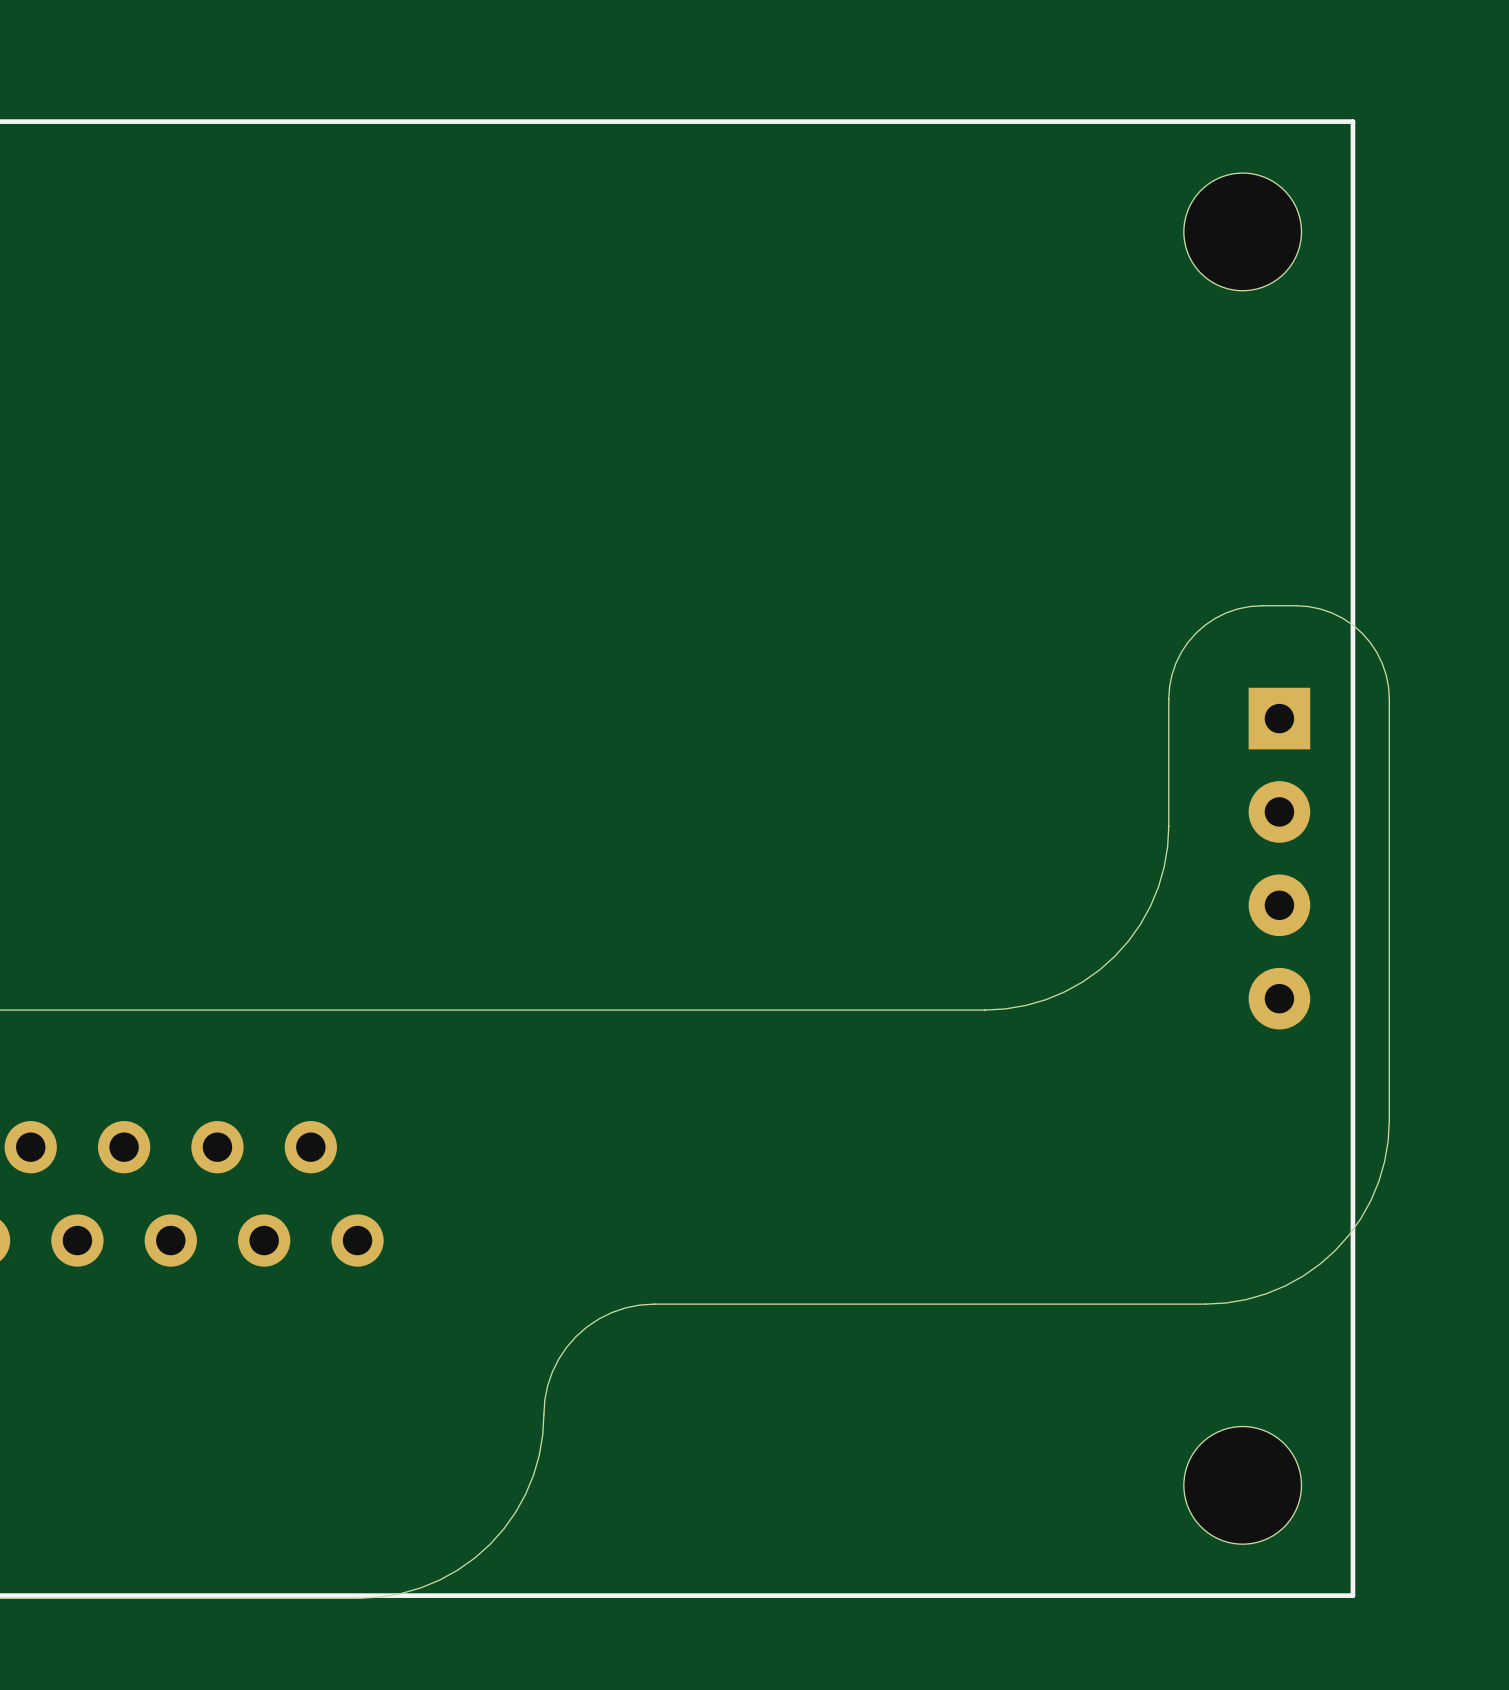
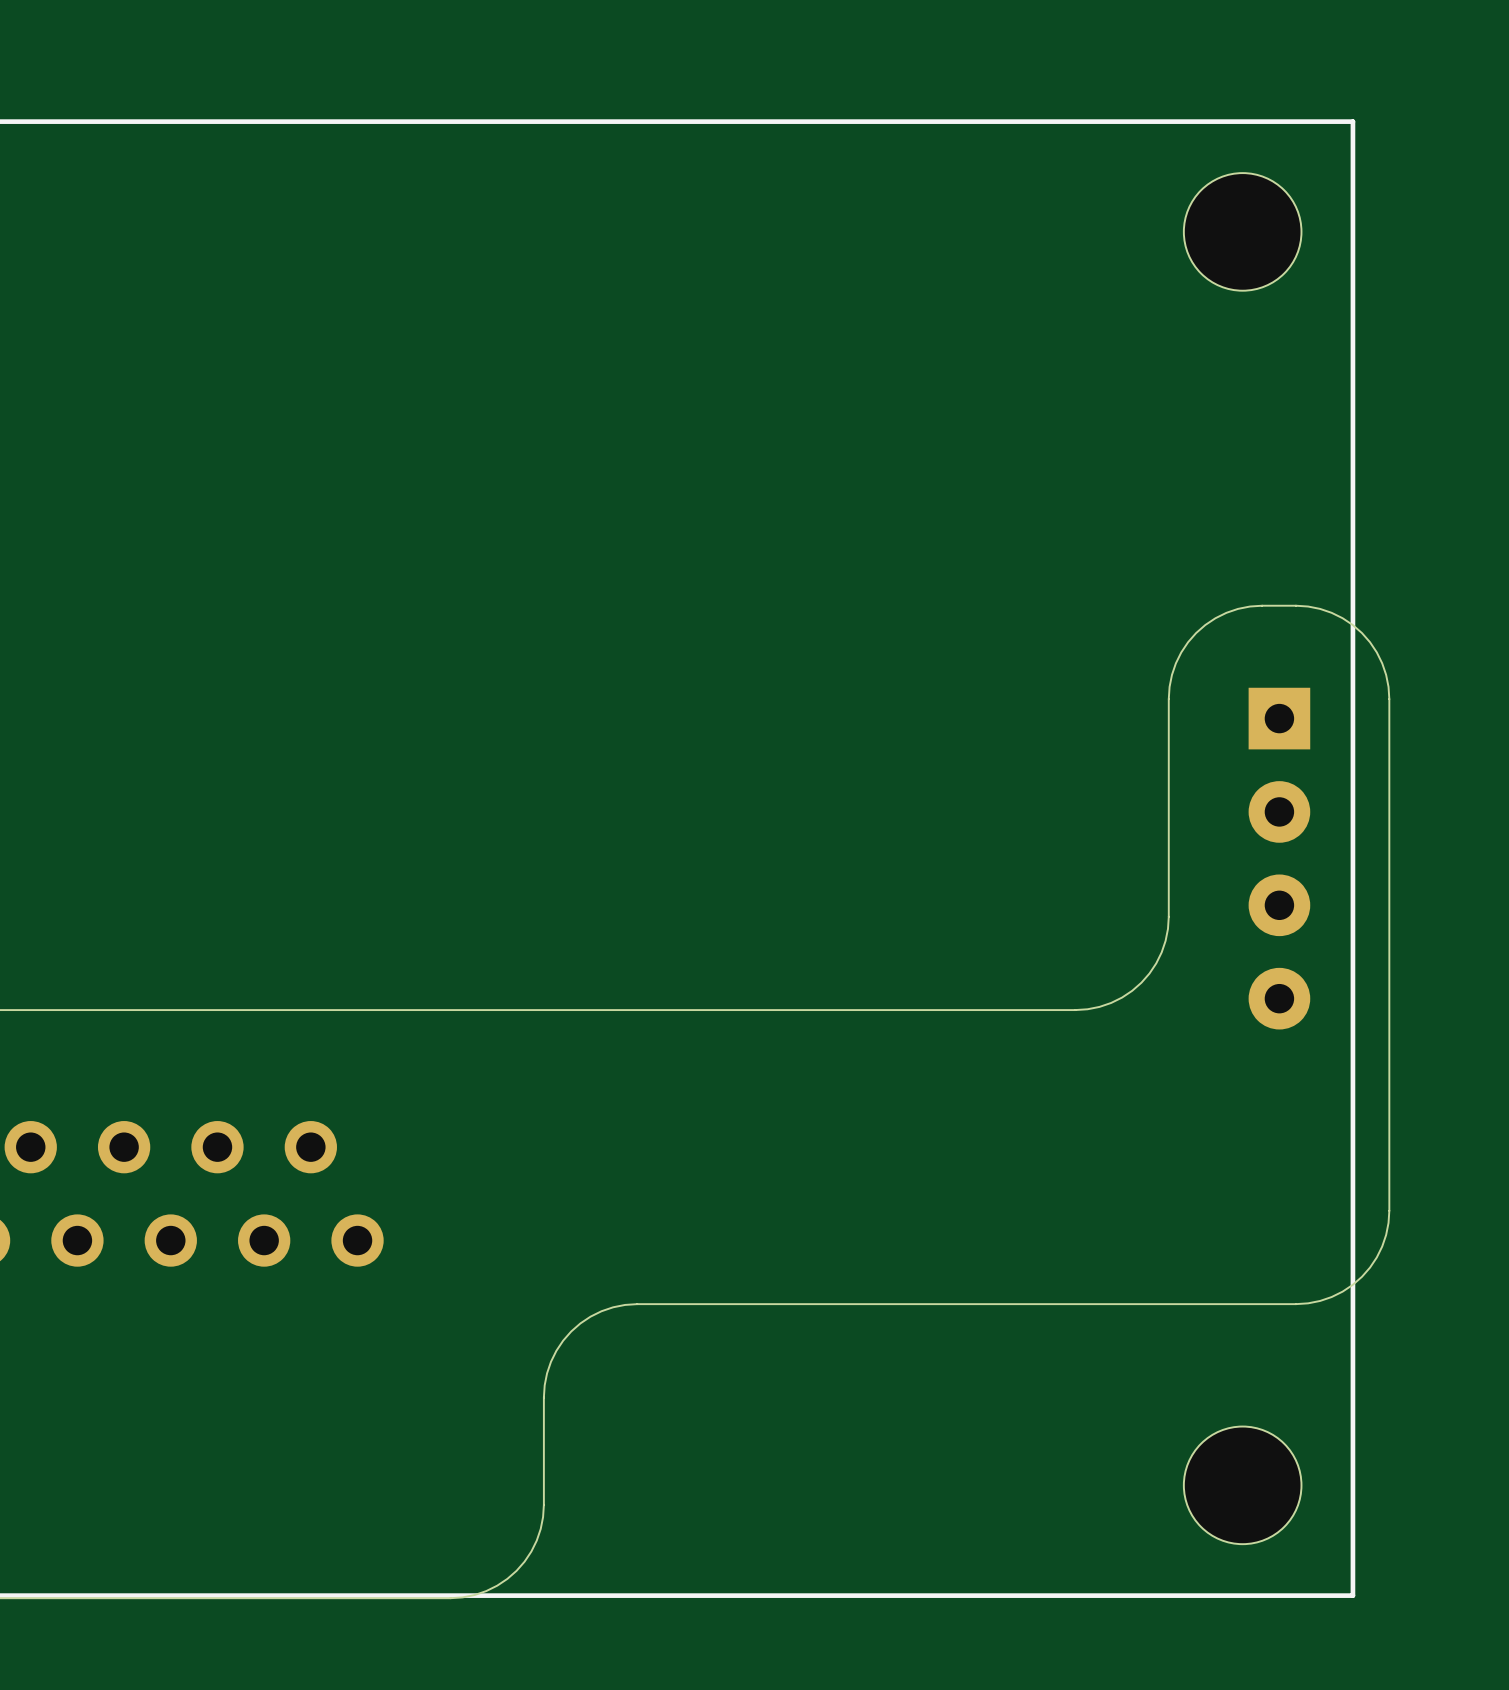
board edge: (1168, 826) (1167, 846) (1158, 886) (1140, 924) (1114, 956) (1082, 981) (1045, 999) (1005, 1008) (984, 1010) -> (1168, 826) (1167, 928) (1161, 952) (1149, 973) (1141, 982) (1132, 990) (1111, 1002) (1087, 1009) (984, 1010)
board edge: (1389, 1120) (1388, 1140) (1379, 1181) (1361, 1218) (1335, 1250) (1303, 1275) (1266, 1293) (1226, 1302) (1205, 1304) -> (1389, 1120) (1388, 1222) (1382, 1246) (1370, 1267) (1361, 1276) (1352, 1284) (1331, 1297) (1308, 1303) (1205, 1304)
board edge: (654, 1304) (625, 1307) (599, 1318) (587, 1326) (566, 1347) (558, 1359) (547, 1385) (542, 1434) (533, 1475) (515, 1512) (490, 1544) (457, 1570) (420, 1587) (380, 1597) (360, 1598) -> (654, 1304) (625, 1304) (601, 1311) (580, 1323) (571, 1331) (556, 1350) (547, 1373) (544, 1385) (543, 1517) (536, 1540) (524, 1561) (516, 1570) (507, 1578) (486, 1591) (462, 1597) (360, 1598)

